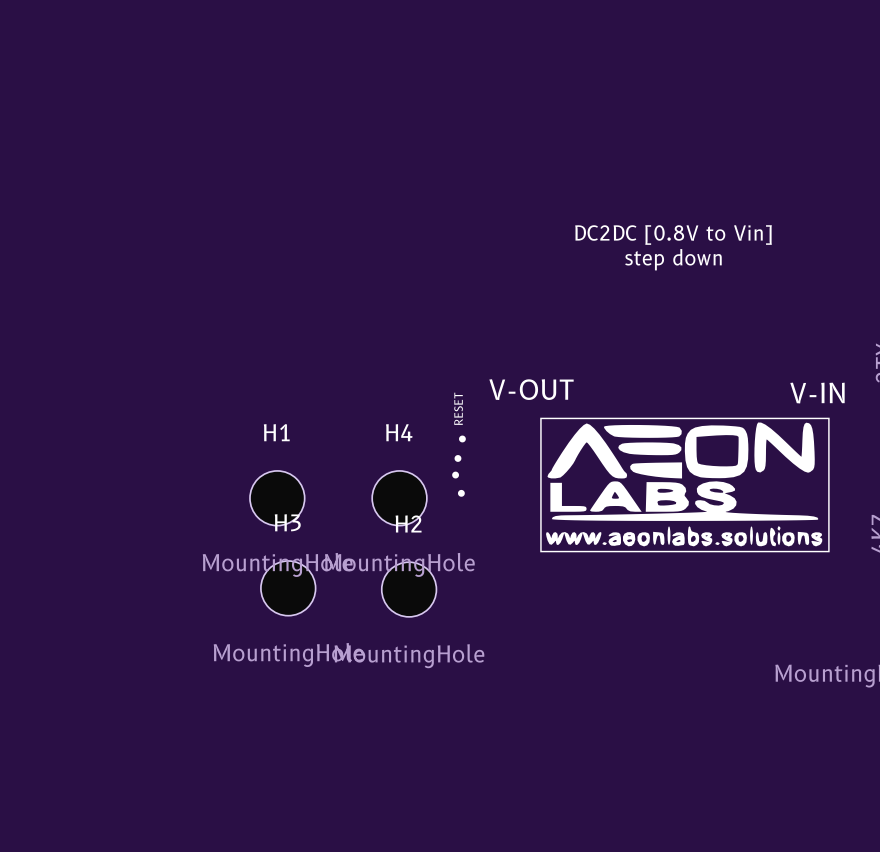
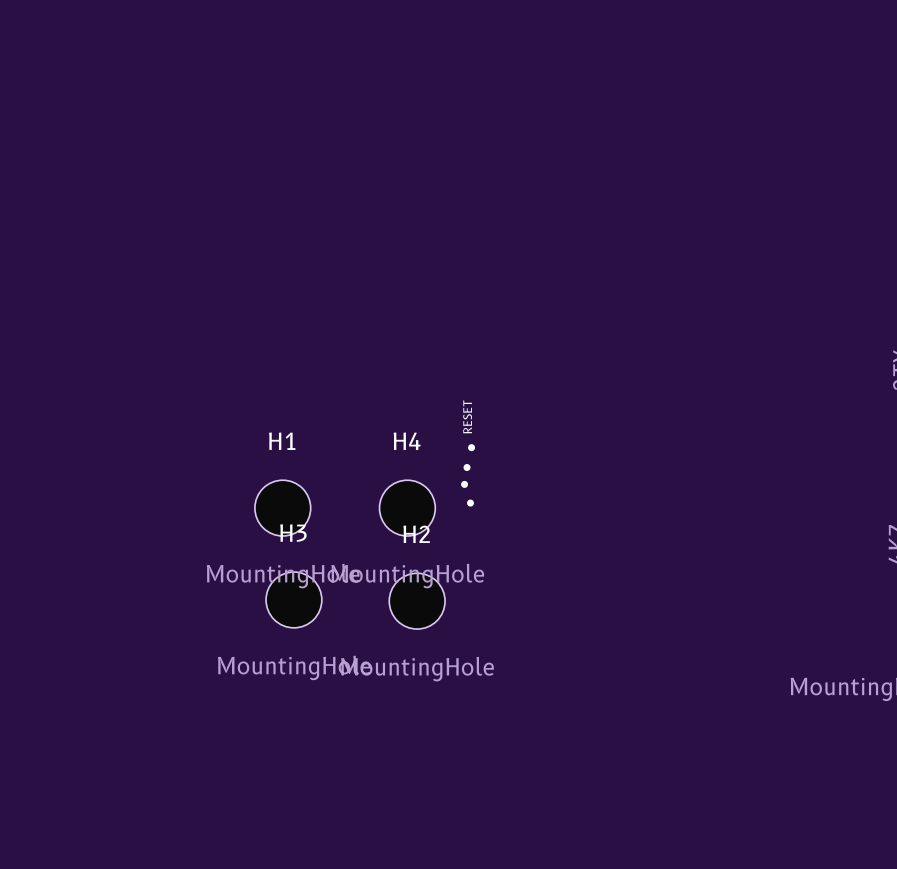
text: DC2DC [0.8V to Vin] (673, 235) -> none
text: step down (673, 259) -> none
text: V-OUT (531, 389) -> none
text: V-IN (817, 393) -> none
drawing: [540, 417, 830, 553] -> none

